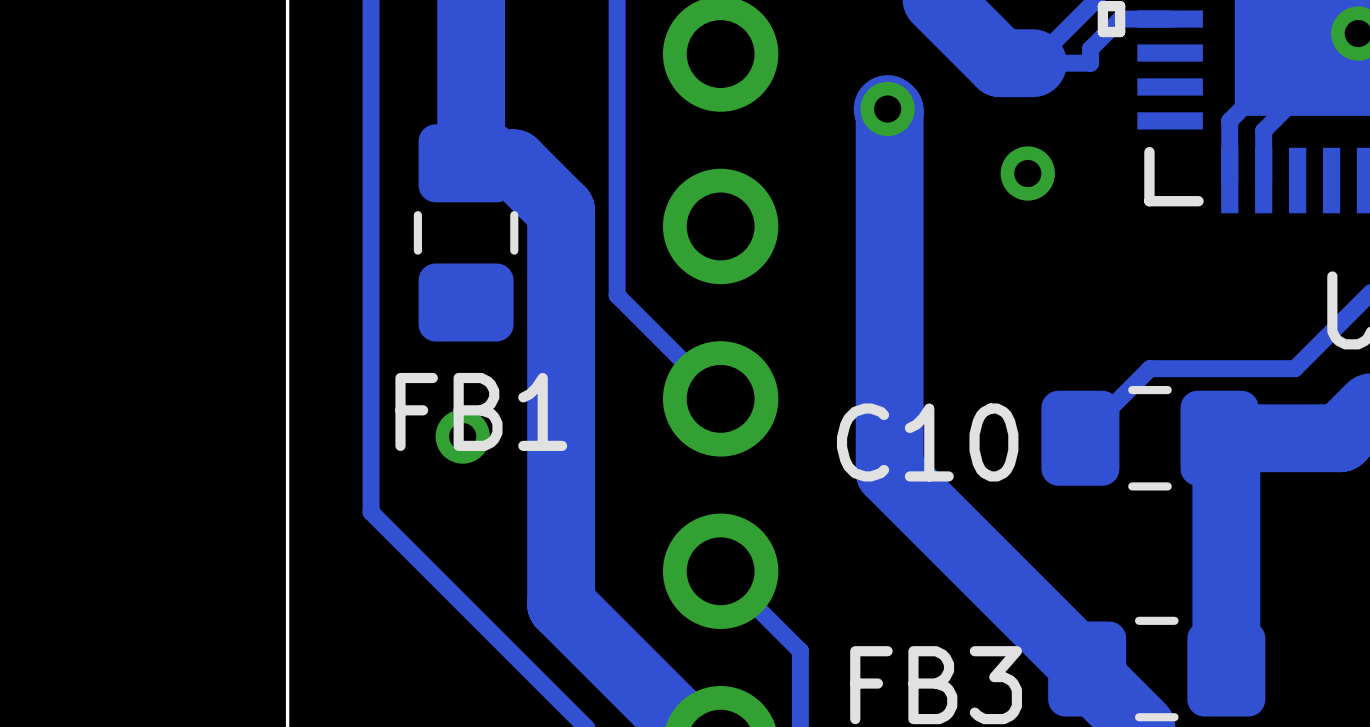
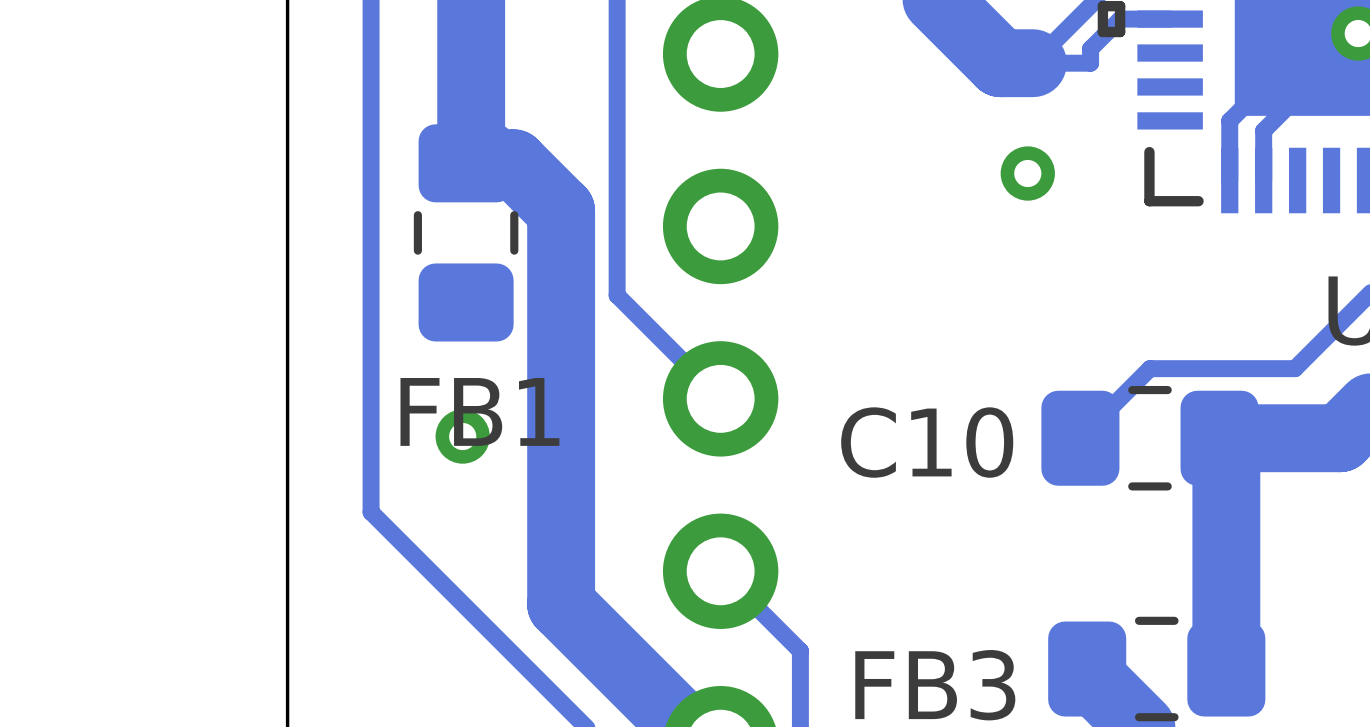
track: (887, 109) (889, 111) (889, 471) (1087, 669) -> none
via: (887, 109) -> none

